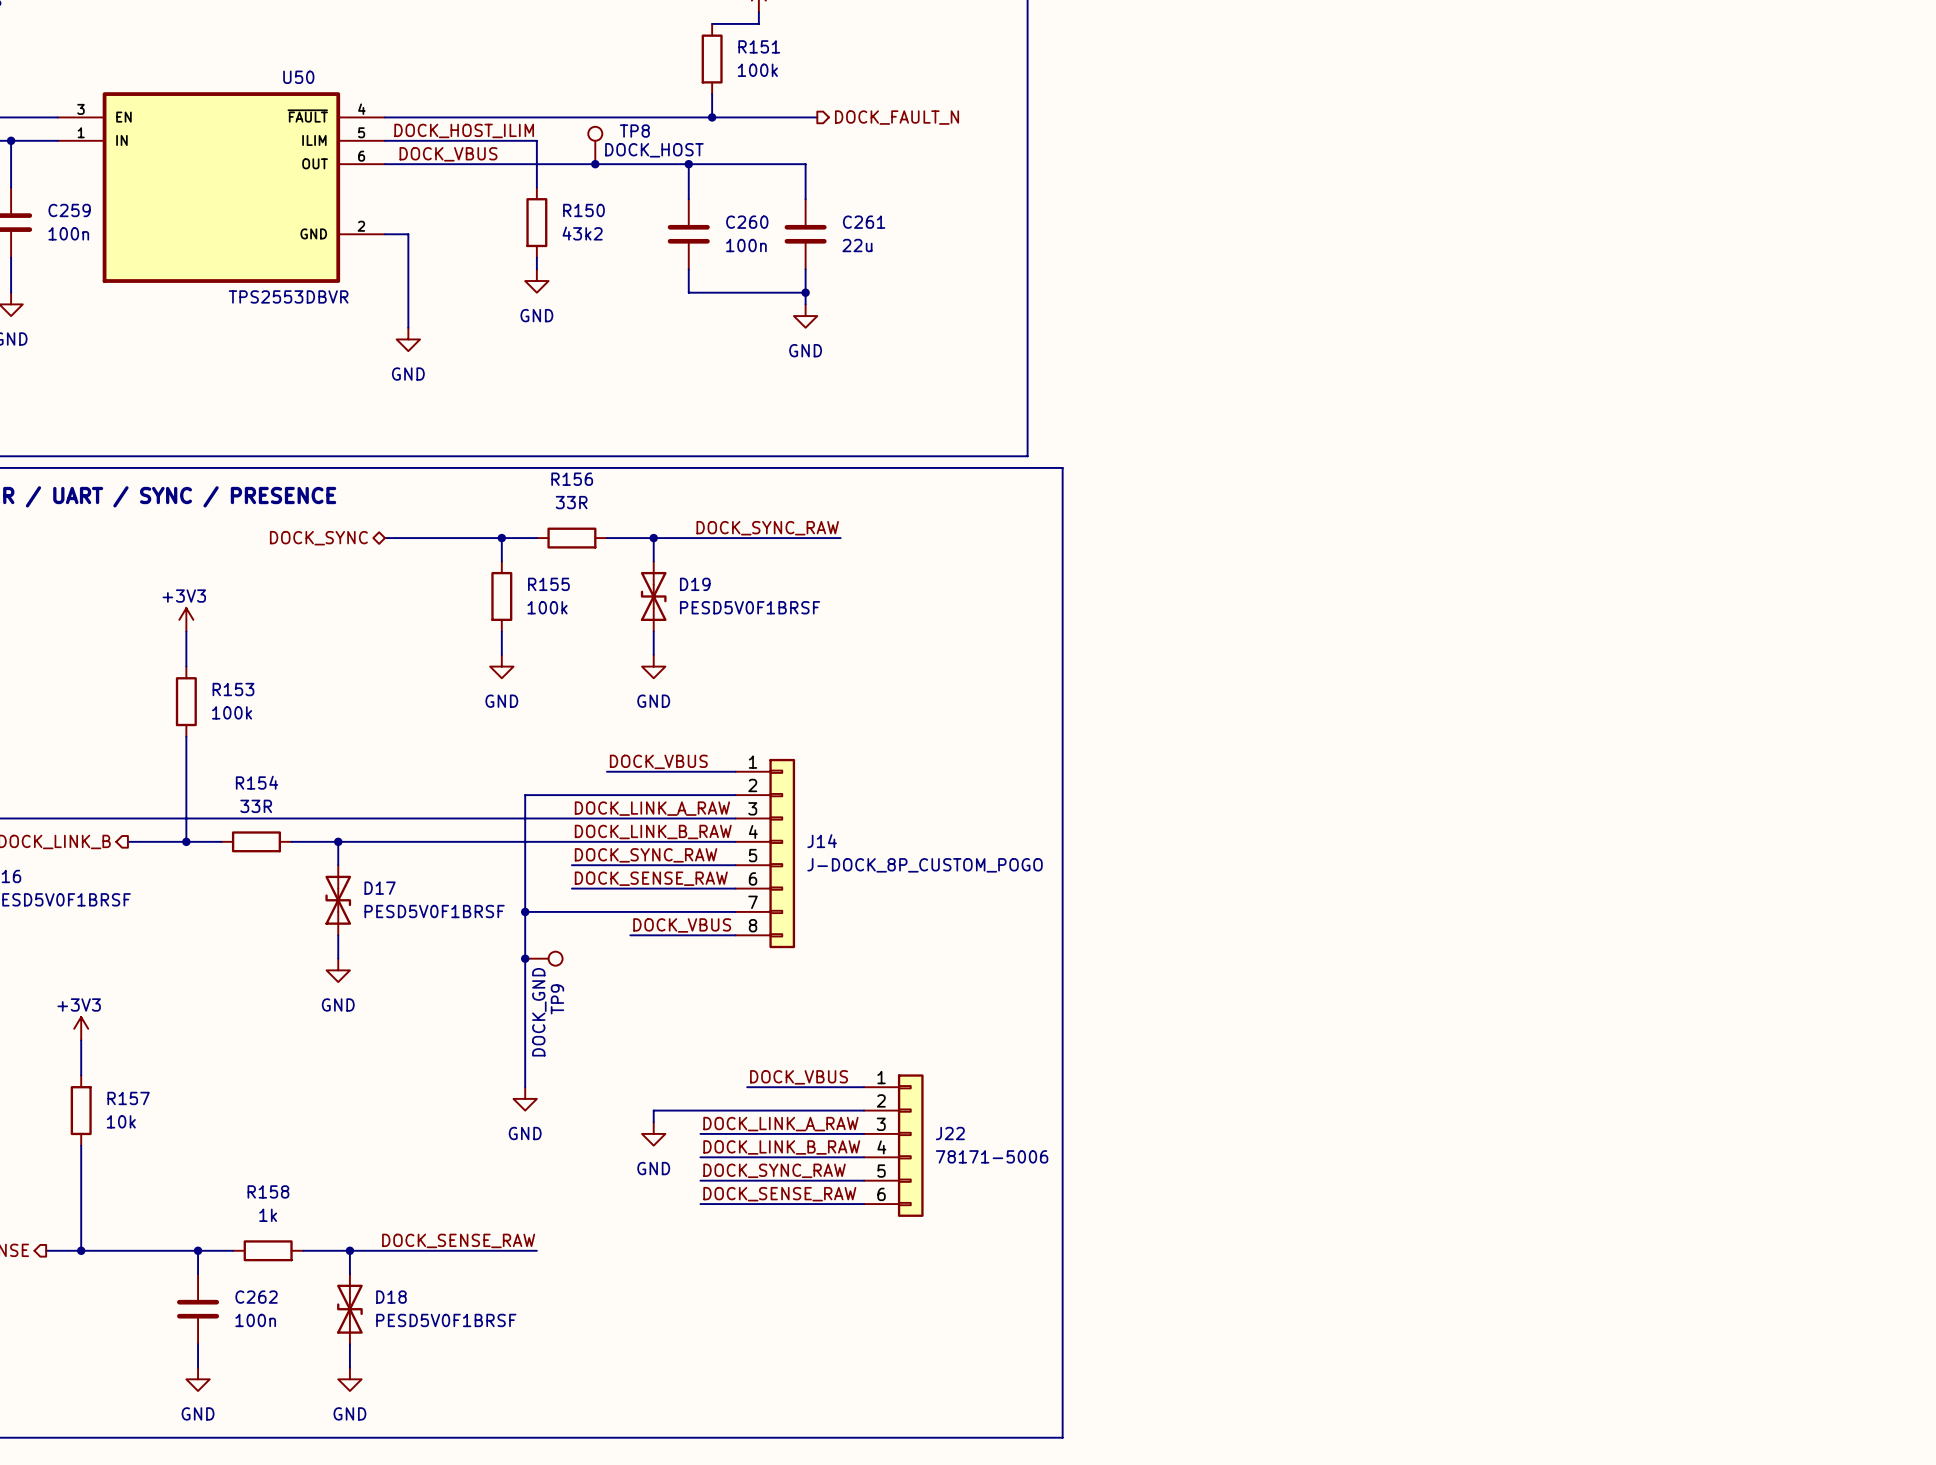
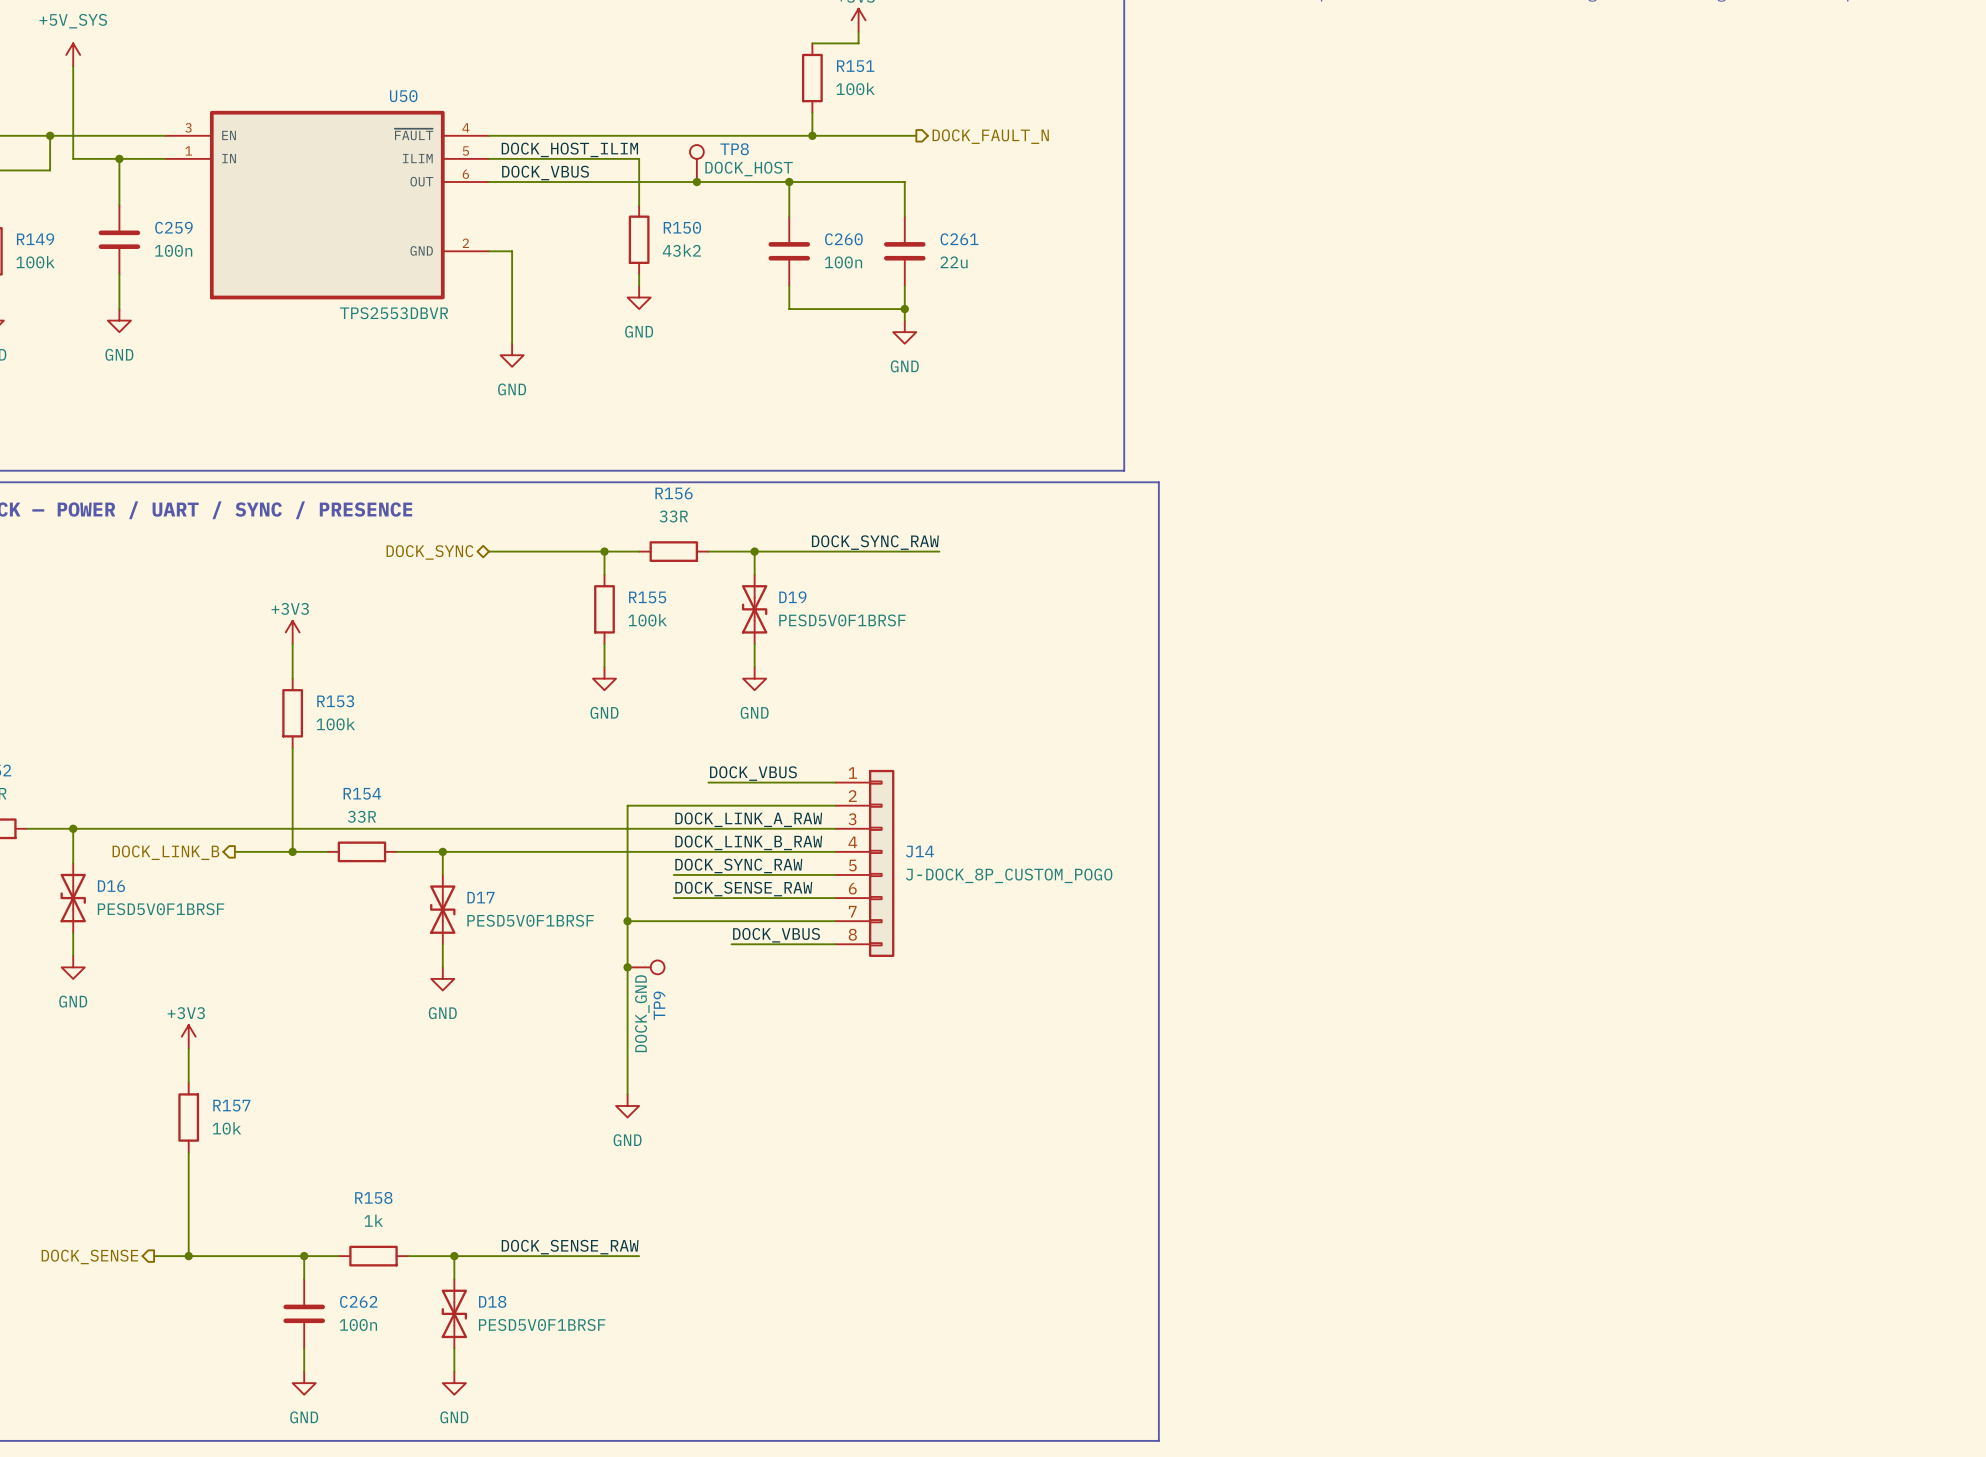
label: DOCK_VBUS (799, 1077) -> none
wire: (747, 1087) (864, 1087) -> none
wire: (864, 1110) (653, 1110) (653, 1122) -> none
label: DOCK_LINK_A_RAW (780, 1124) -> none
power symbol: GND (653, 1133) -> none
wire: (700, 1133) (864, 1133) -> none
J22: 78171-5006 (893, 1145) -> none
label: DOCK_LINK_B_RAW (781, 1147) -> none
wire: (700, 1157) (864, 1157) -> none
label: DOCK_SYNC_RAW (774, 1170) -> none
wire: (700, 1180) (864, 1180) -> none
label: DOCK_SENSE_RAW (779, 1194) -> none
wire: (700, 1204) (864, 1204) -> none

